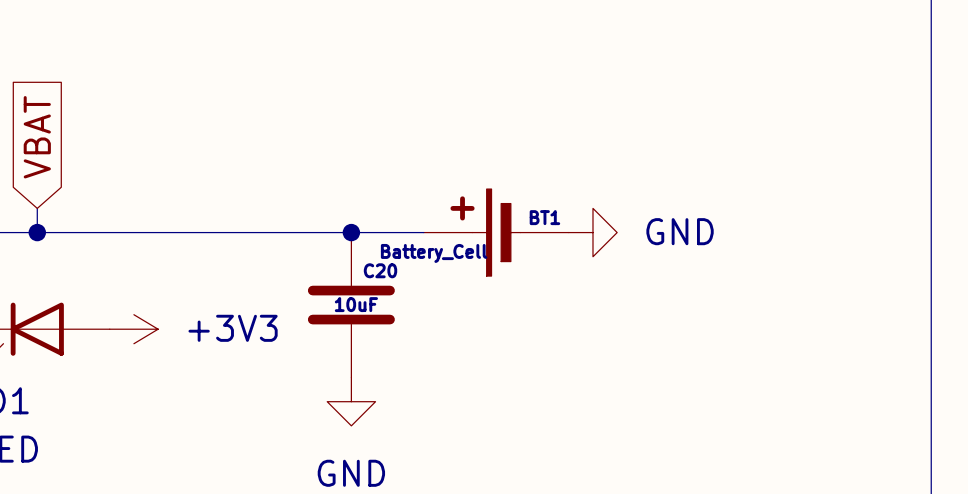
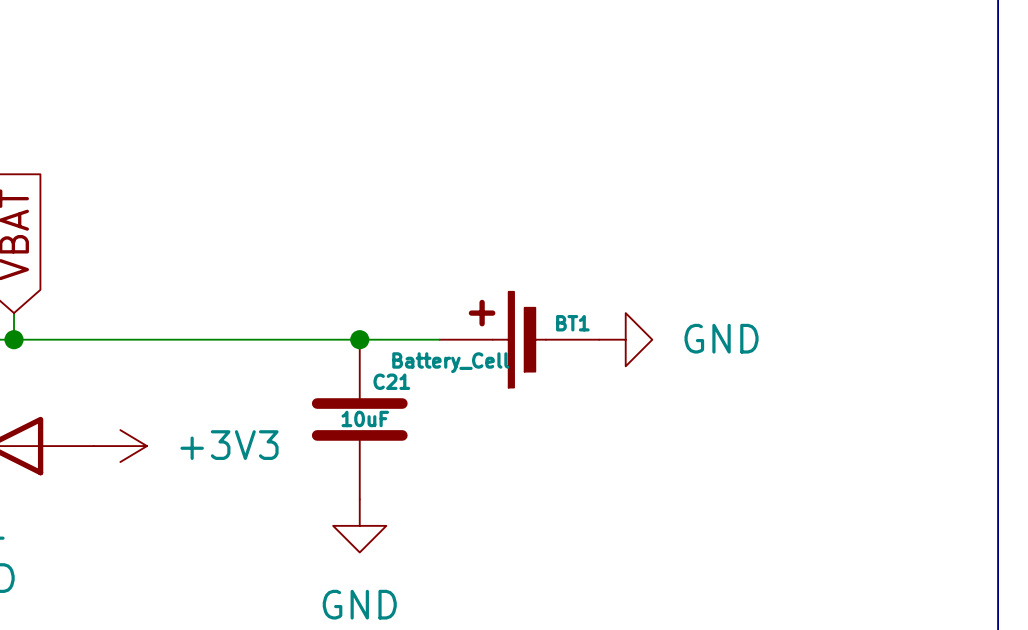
C20 name: C20 (380, 270) -> C21 (391, 381)

